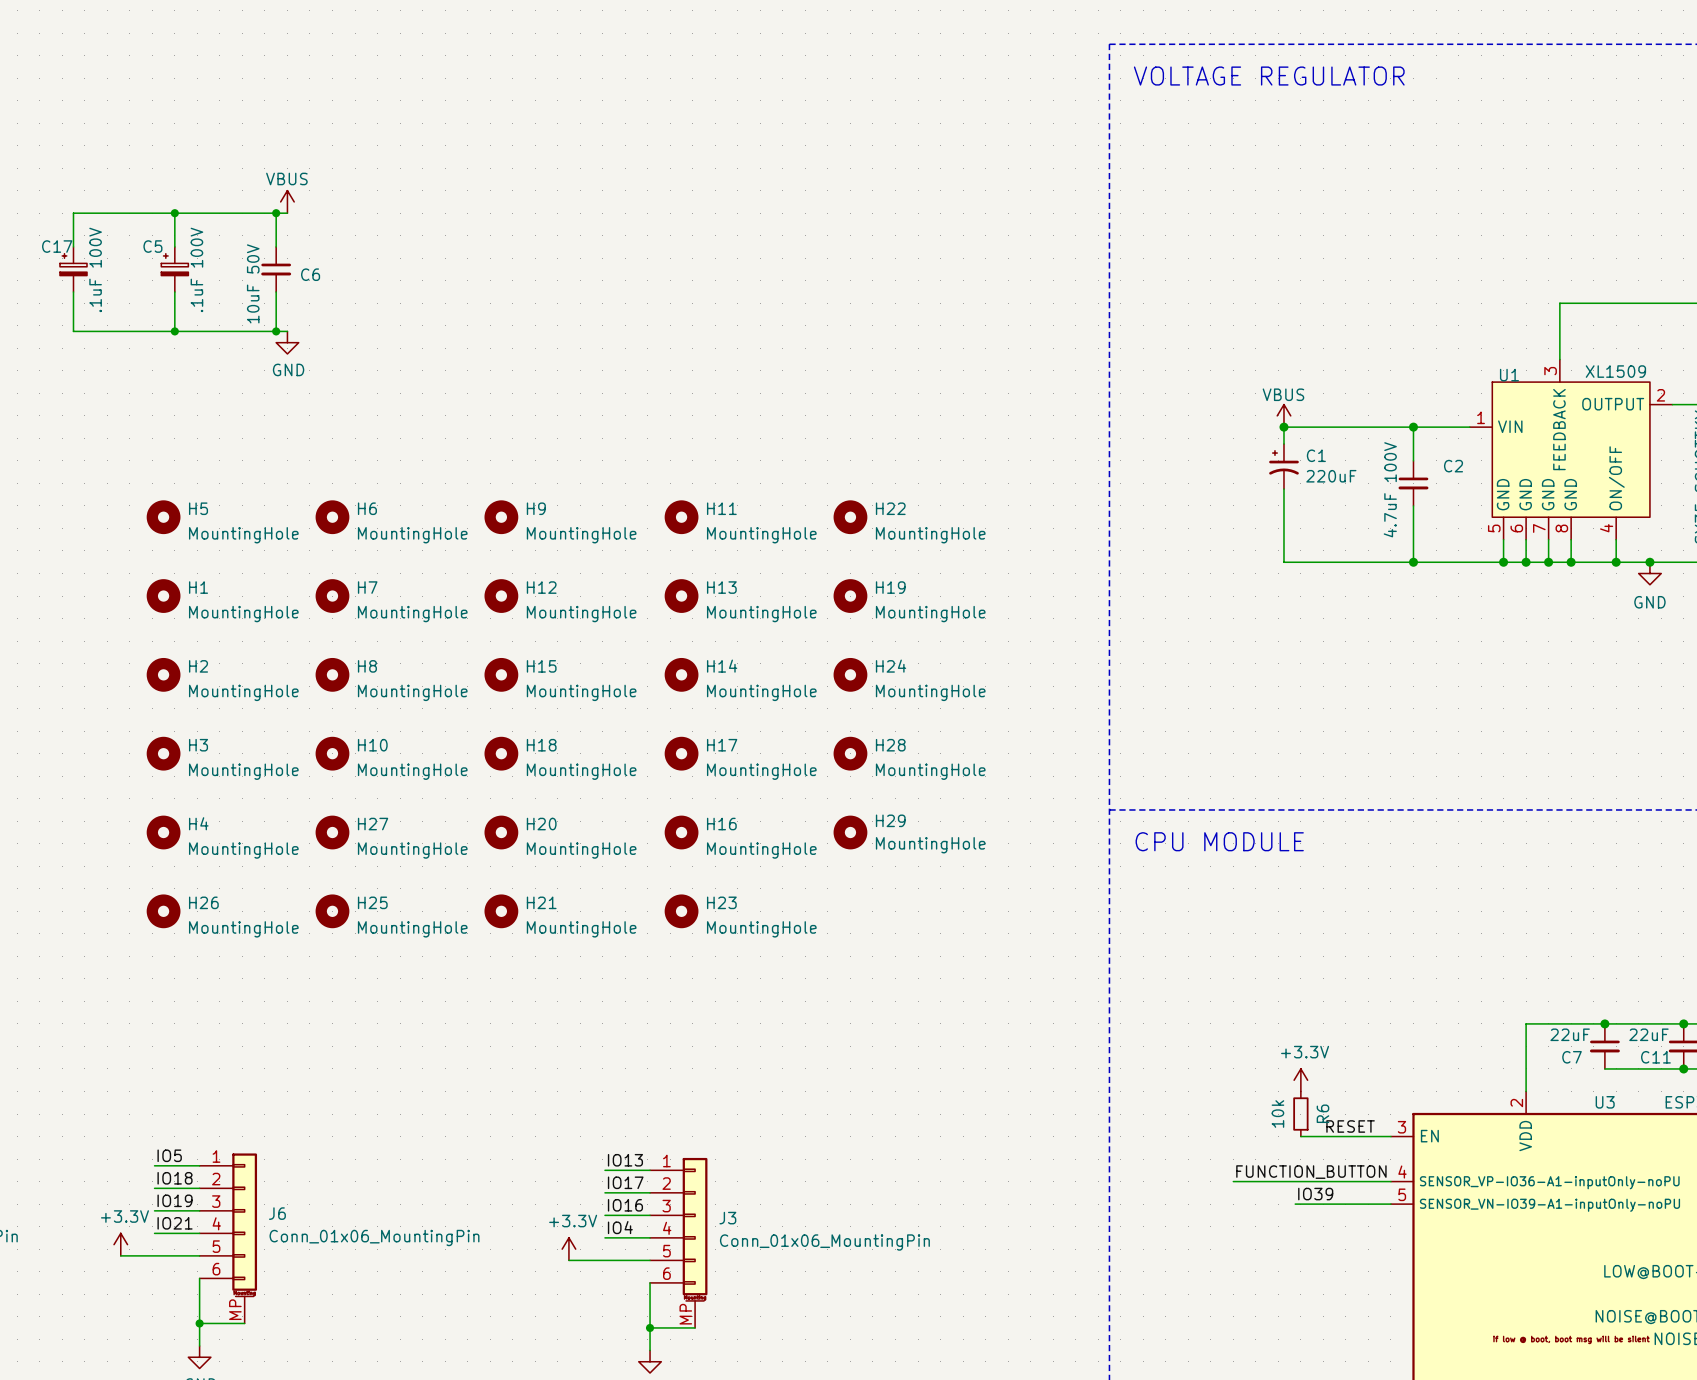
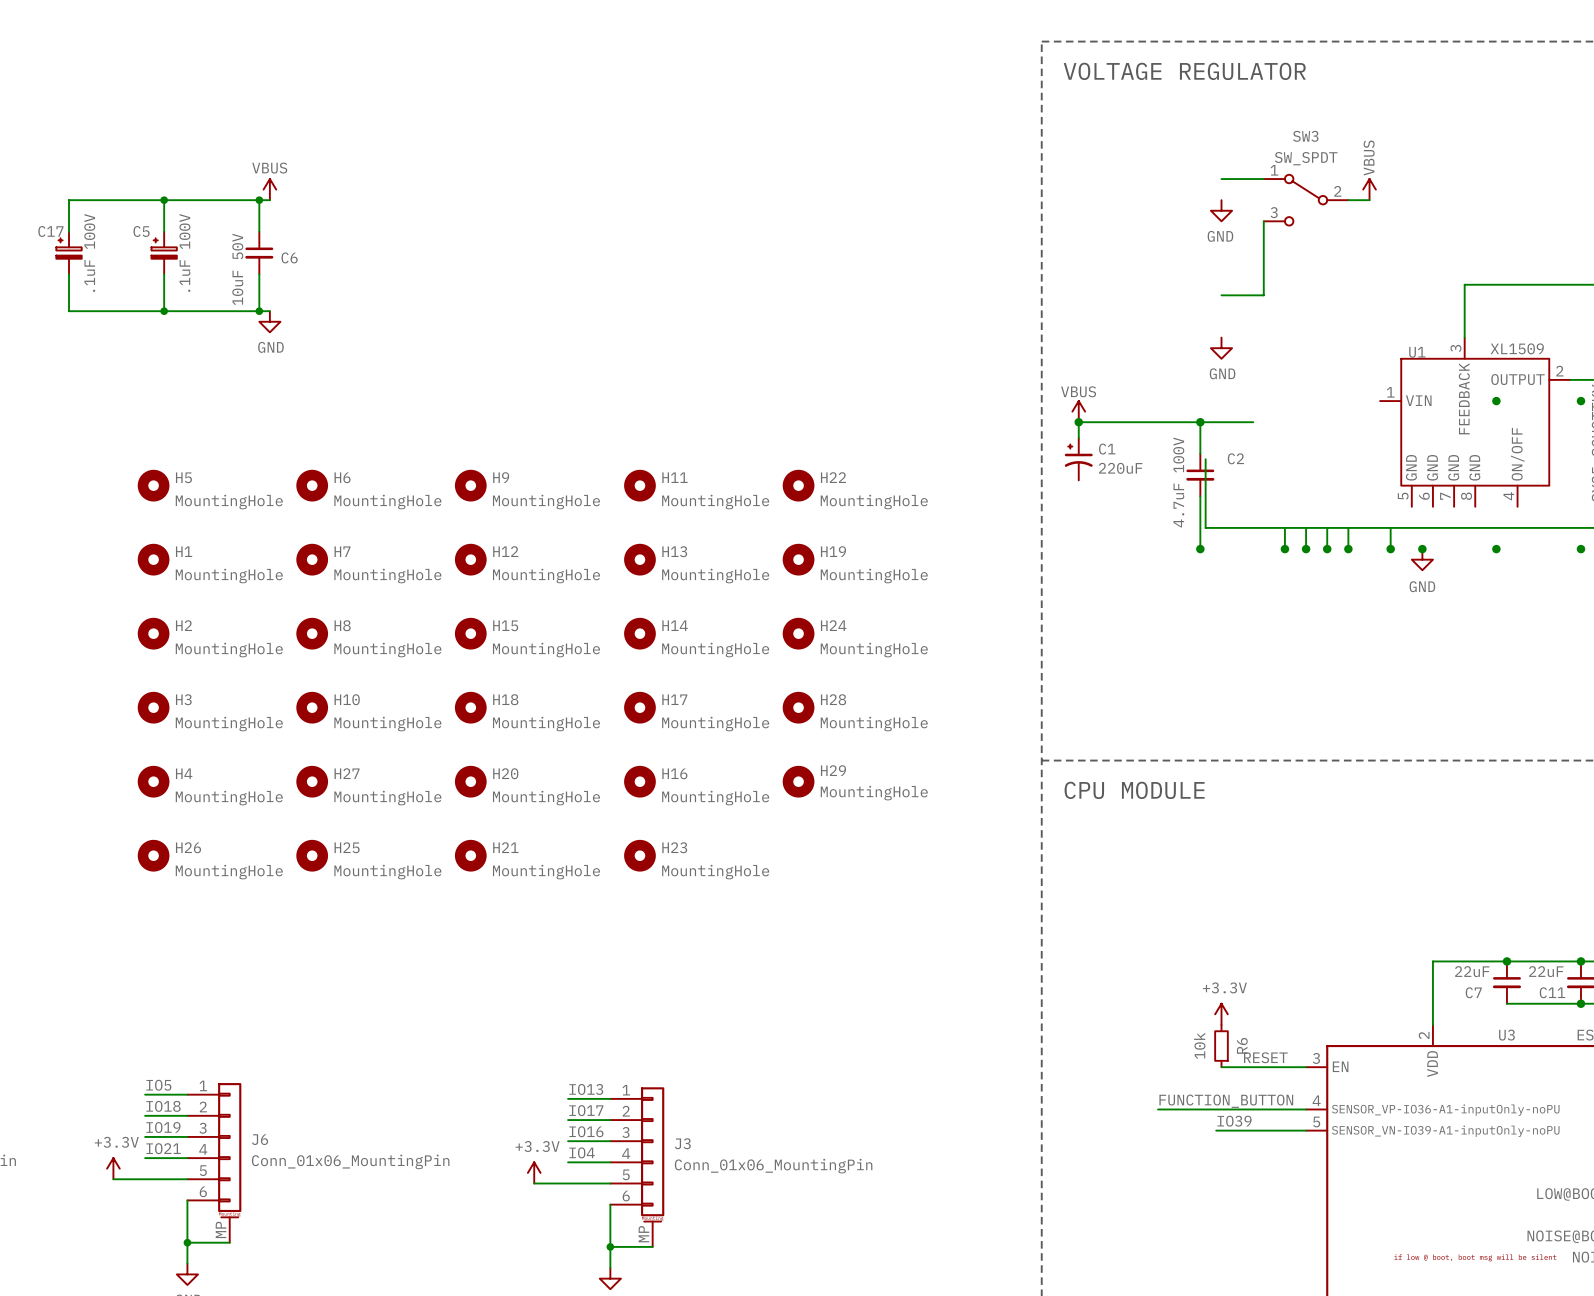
wire: none -> (1221, 179) (1263, 179)
power symbol: none -> VBUS (1369, 189)
SW3: none -> SW_SPDT (1306, 200)
wire: none -> (1348, 200) (1369, 200)
power symbol: none -> GND (1221, 210)
wire: none -> (1263, 221) (1263, 295) (1221, 295)
power symbol: none -> GND (1221, 348)
power symbol position: VBUS (1283, 415) -> VBUS (1078, 411)
junction position: (1283, 427) -> (1200, 422)
wire: (1413, 427) (1413, 460) -> (1200, 422) (1200, 453)
junction: (1413, 427) -> none
wire: (1469, 427) (1283, 427) (1283, 444) -> (1253, 422) (1078, 422) (1078, 438)
junction: none -> (1496, 401)
junction: none -> (1580, 401)
junction: none -> (1078, 422)
C1 position: (1283, 466) -> (1078, 459)
C2 position: (1413, 483) -> (1200, 475)
wire: (1413, 505) (1413, 562) -> (1327, 549) (1327, 527)
wire: none -> (1200, 496) (1200, 549)
wire: (1503, 539) (1503, 562) -> (1284, 527) (1284, 549)
wire: (1526, 539) (1526, 562) -> (1306, 527) (1306, 549)
wire: (1548, 539) (1548, 562) -> none
wire: (1571, 539) (1571, 562) -> (1348, 527) (1348, 549)
wire: (1616, 539) (1616, 562) -> (1390, 527) (1390, 549)
junction: (1413, 562) -> none
junction: (1503, 562) -> none
junction: (1526, 562) -> none
junction: (1548, 562) -> none
junction: (1571, 562) -> none
junction: (1616, 562) -> none
junction: (1649, 562) -> none
power symbol: GND (1649, 573) -> none
junction: none -> (1200, 549)
junction: none -> (1284, 549)
junction: none -> (1306, 549)
junction: none -> (1327, 549)
junction: none -> (1348, 549)
junction: none -> (1390, 549)
junction: none -> (1422, 549)
junction: none -> (1496, 549)
junction: none -> (1580, 549)
power symbol: none -> GND (1422, 559)

